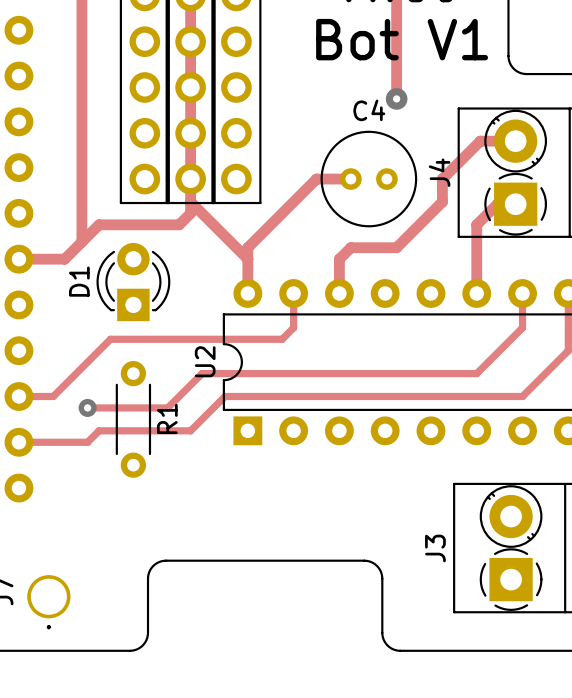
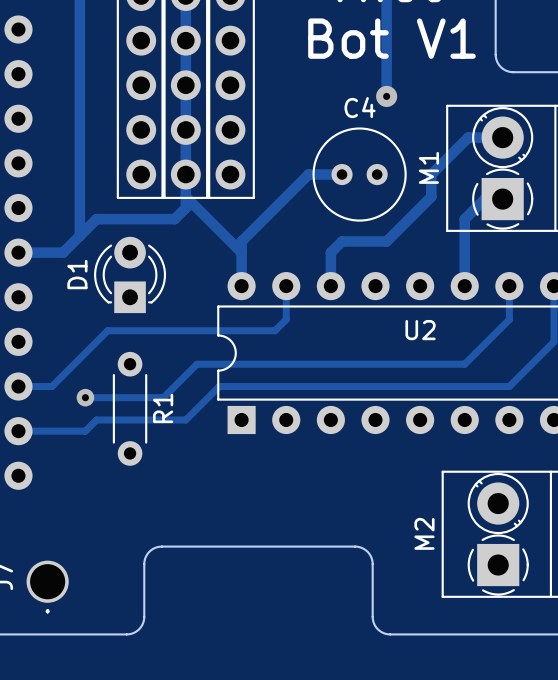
J4 name: J4 (439, 172) -> M1 (428, 167)
U2 name rotation: 0° (205, 361) -> 90° clockwise (420, 330)
U2 name position: U2 (205, 361) -> U2 (420, 330)
J3 name: J3 (435, 548) -> M2 (424, 533)

